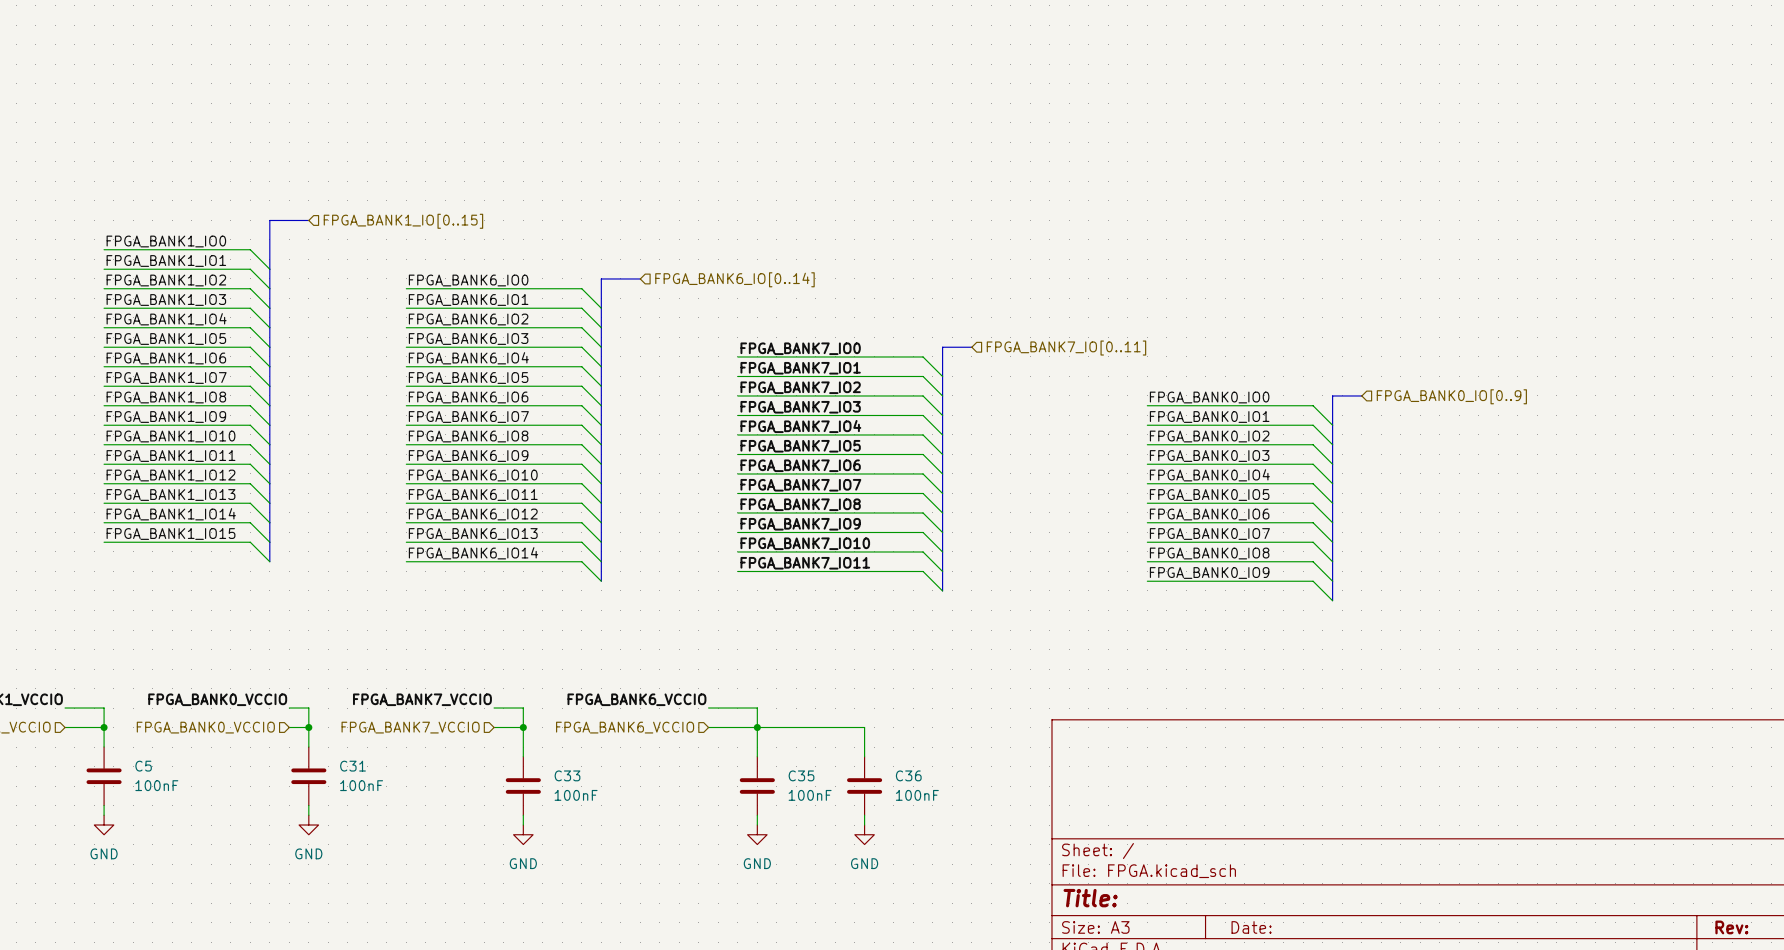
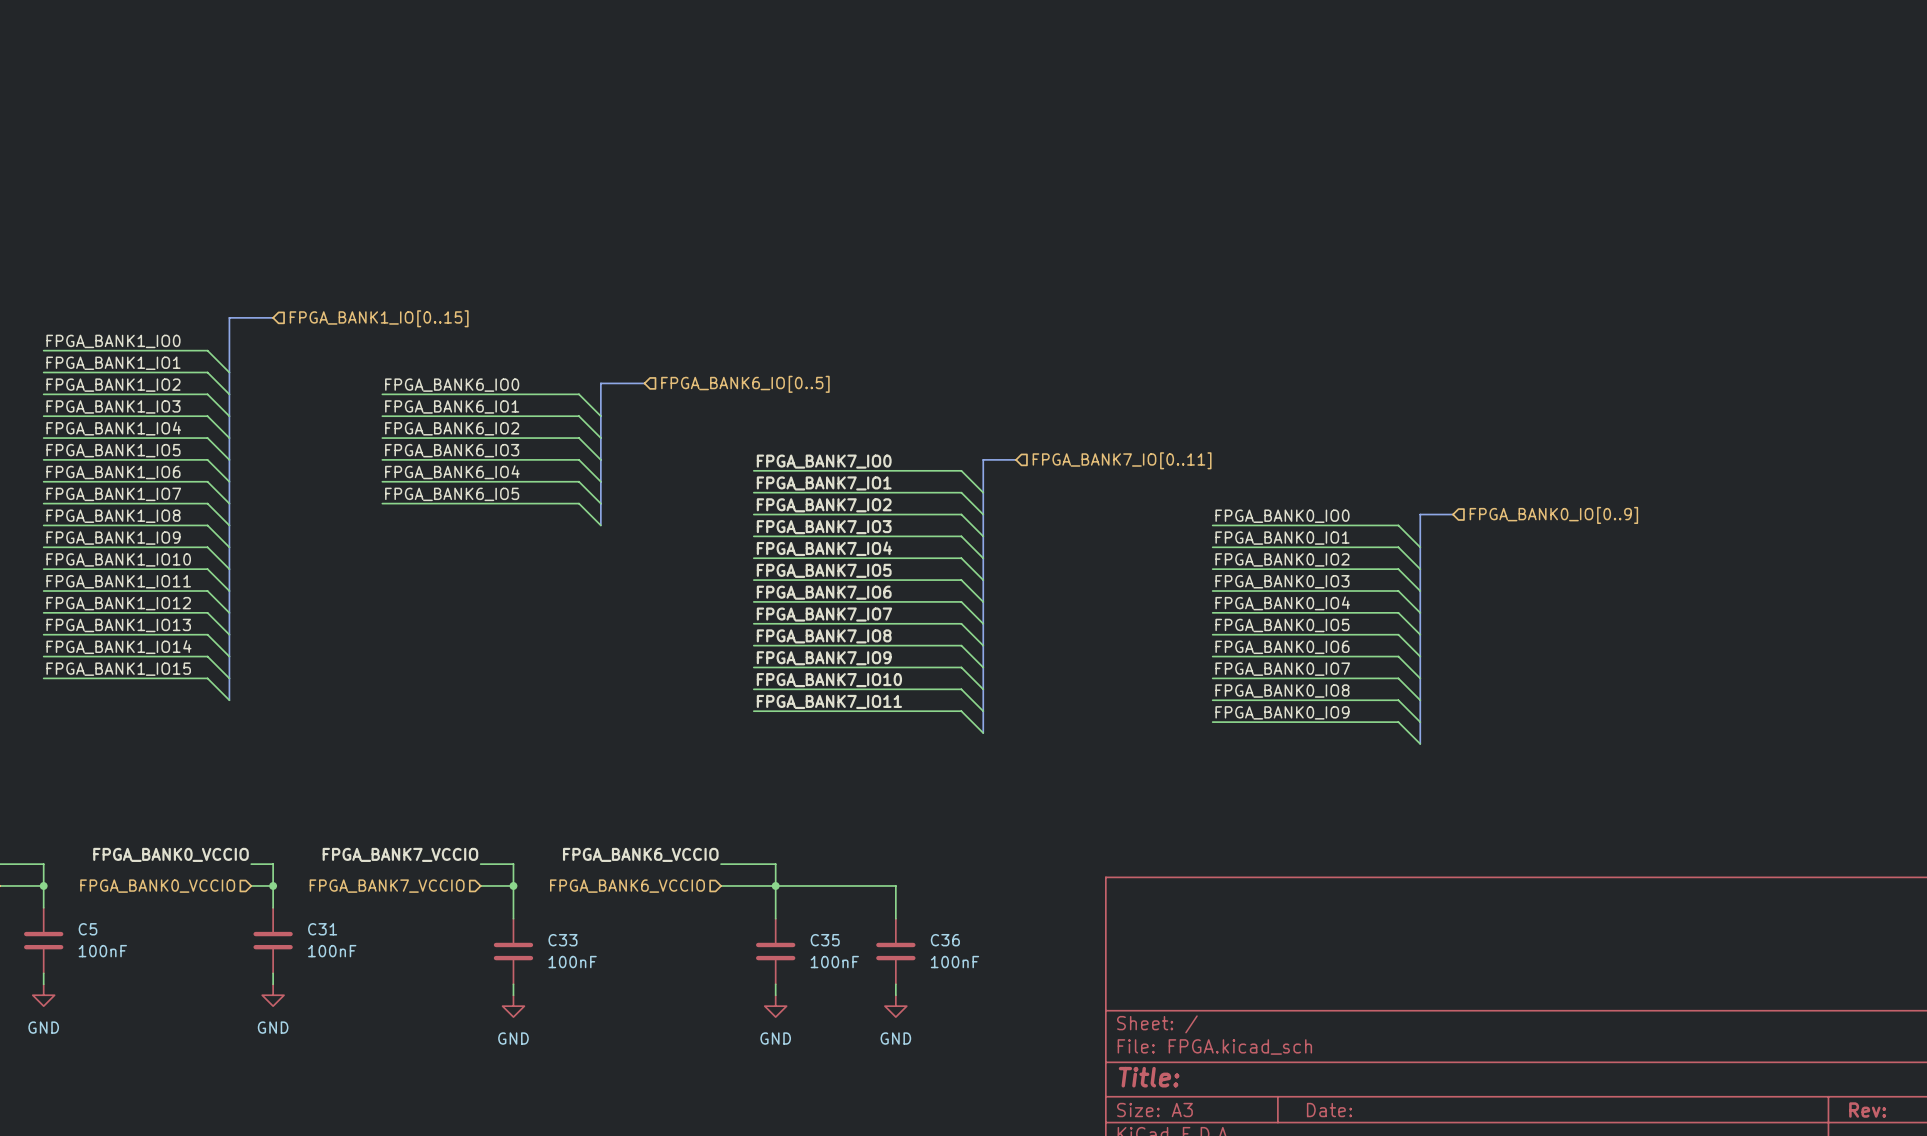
hierarchical label: FPGA_BANK6_IO[0..14] (734, 279) -> FPGA_BANK6_IO[0..5] (745, 384)
label: FPGA_BANK6_IO6 (468, 397) -> none
wire: (406, 405) (581, 405) (601, 425) -> none
bus: (601, 405) (601, 581) -> none
label: FPGA_BANK6_IO7 (468, 417) -> none
wire: (406, 425) (581, 425) (601, 444) -> none
label: FPGA_BANK6_IO8 (468, 436) -> none
wire: (406, 444) (581, 444) (601, 464) -> none
label: FPGA_BANK6_IO9 (468, 456) -> none
wire: (406, 464) (581, 464) (601, 483) -> none
label: FPGA_BANK6_IO10 (473, 475) -> none
wire: (406, 483) (581, 483) (601, 503) -> none
label: FPGA_BANK6_IO11 (473, 495) -> none
wire: (406, 503) (581, 503) (601, 522) -> none
label: FPGA_BANK6_IO12 (473, 514) -> none
wire: (406, 522) (581, 522) (601, 542) -> none
label: FPGA_BANK6_IO13 (473, 534) -> none
wire: (406, 542) (581, 542) (601, 561) -> none
label: FPGA_BANK6_IO14 (473, 553) -> none
wire: (406, 561) (581, 561) (601, 581) -> none

